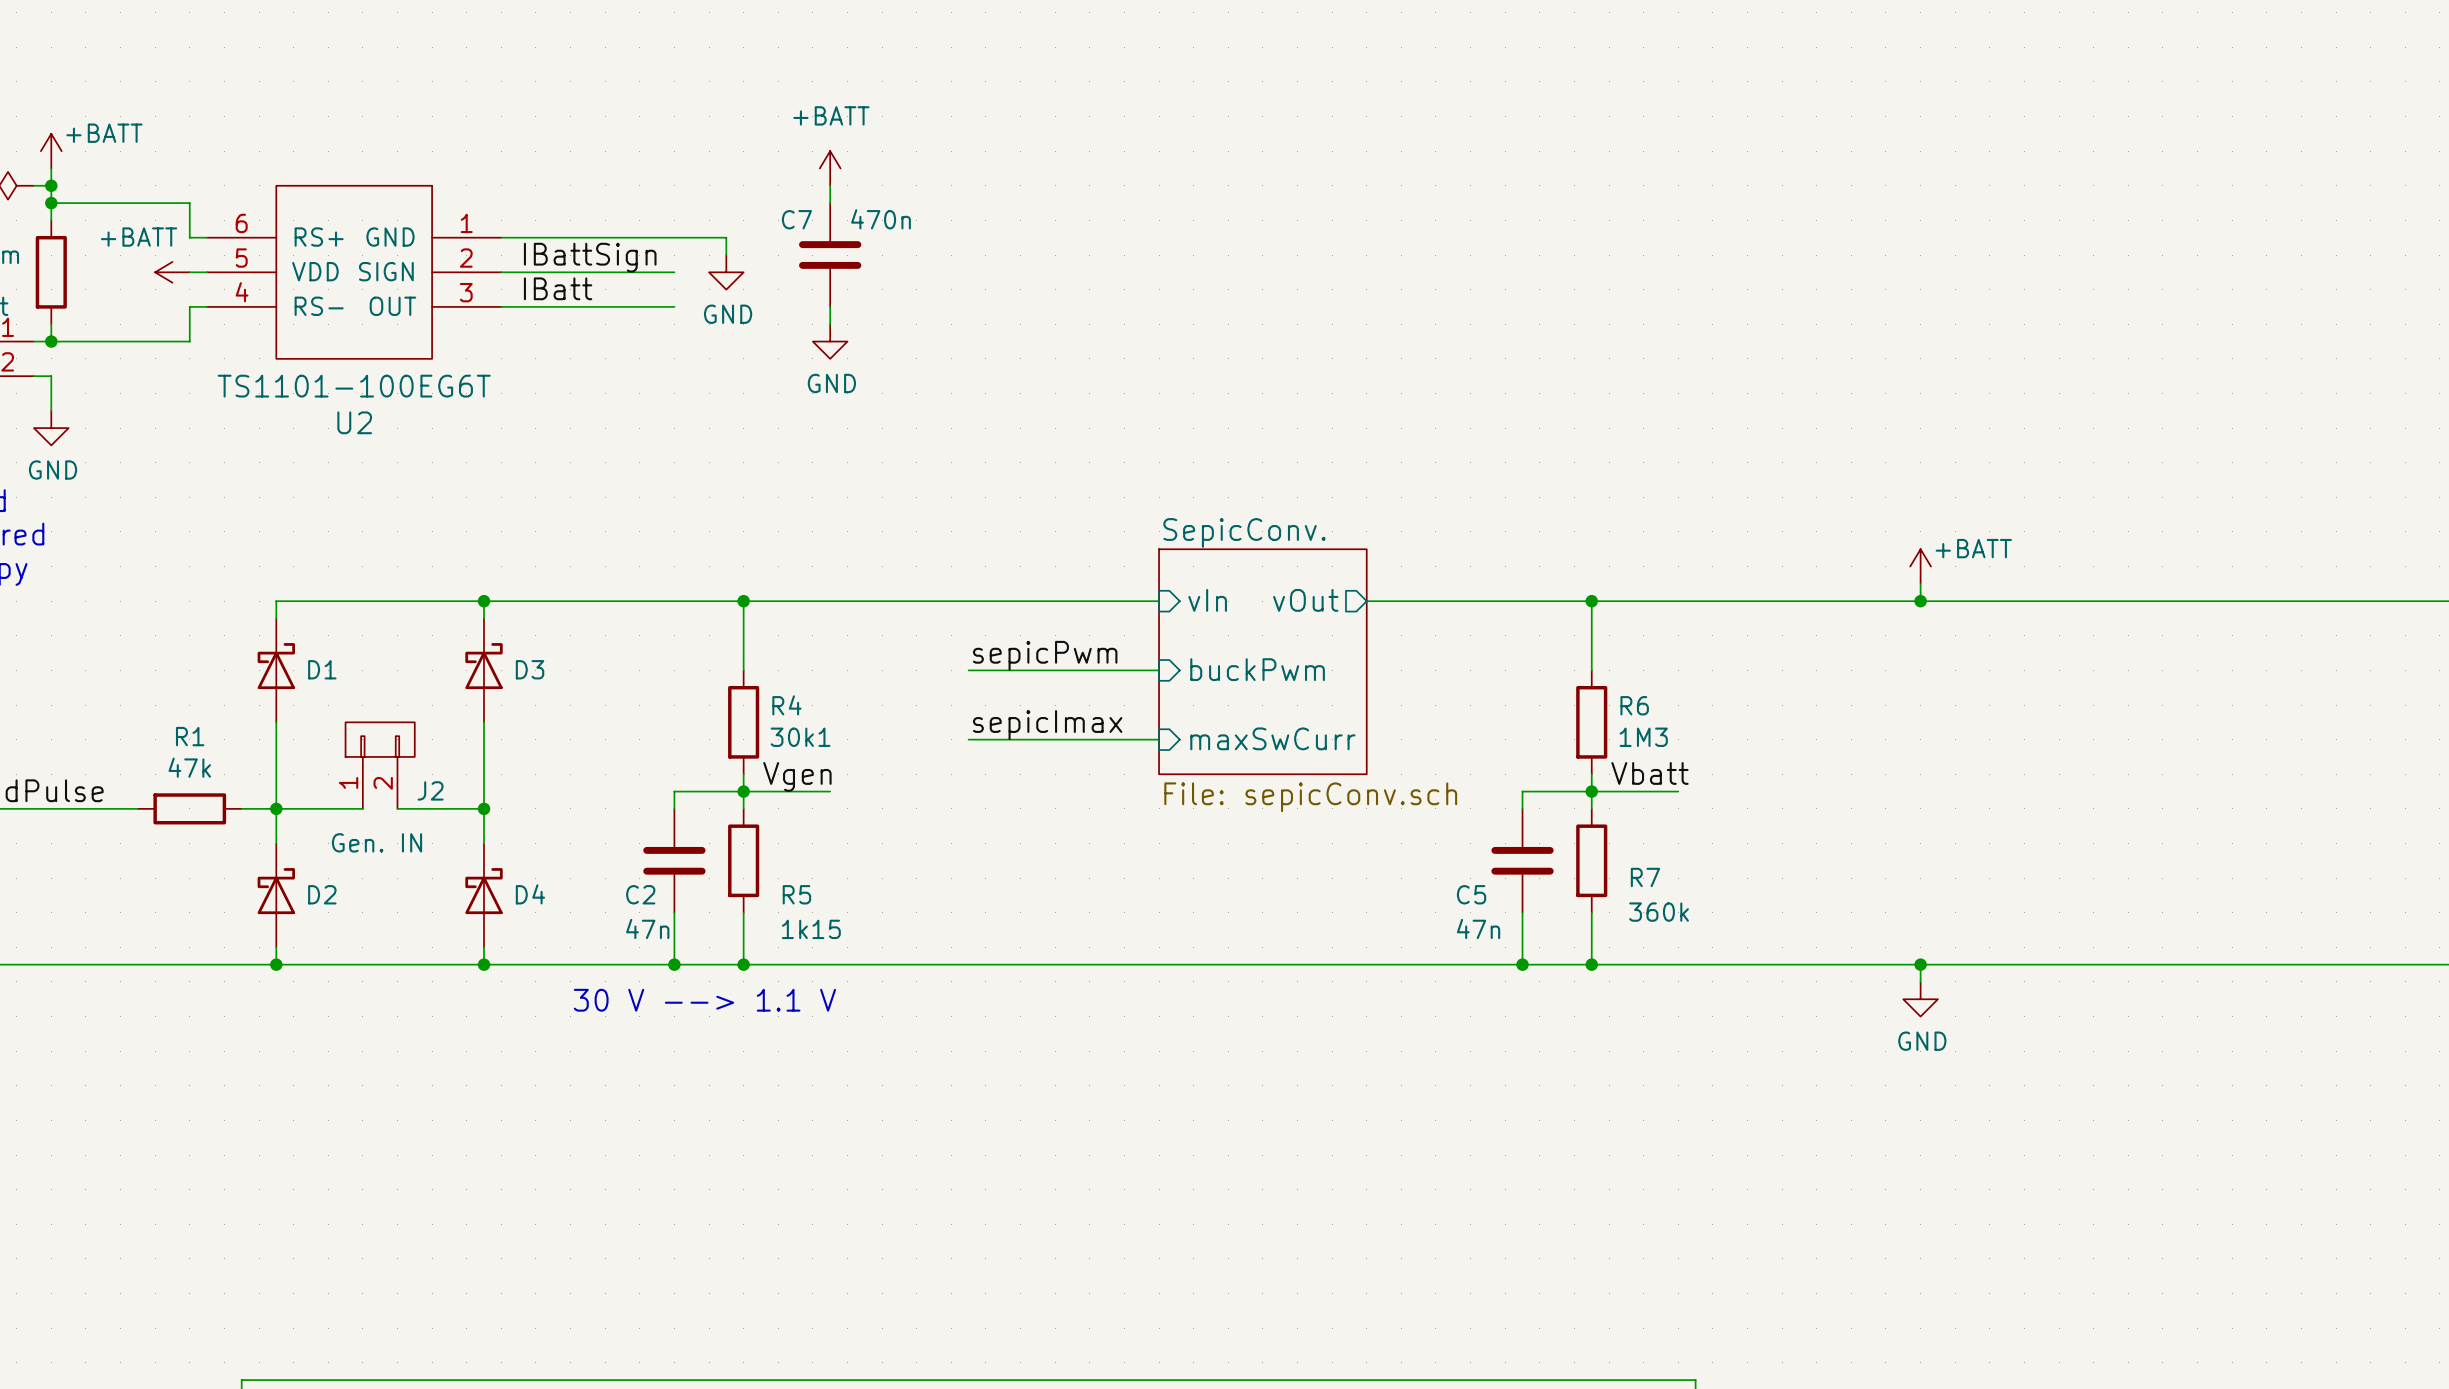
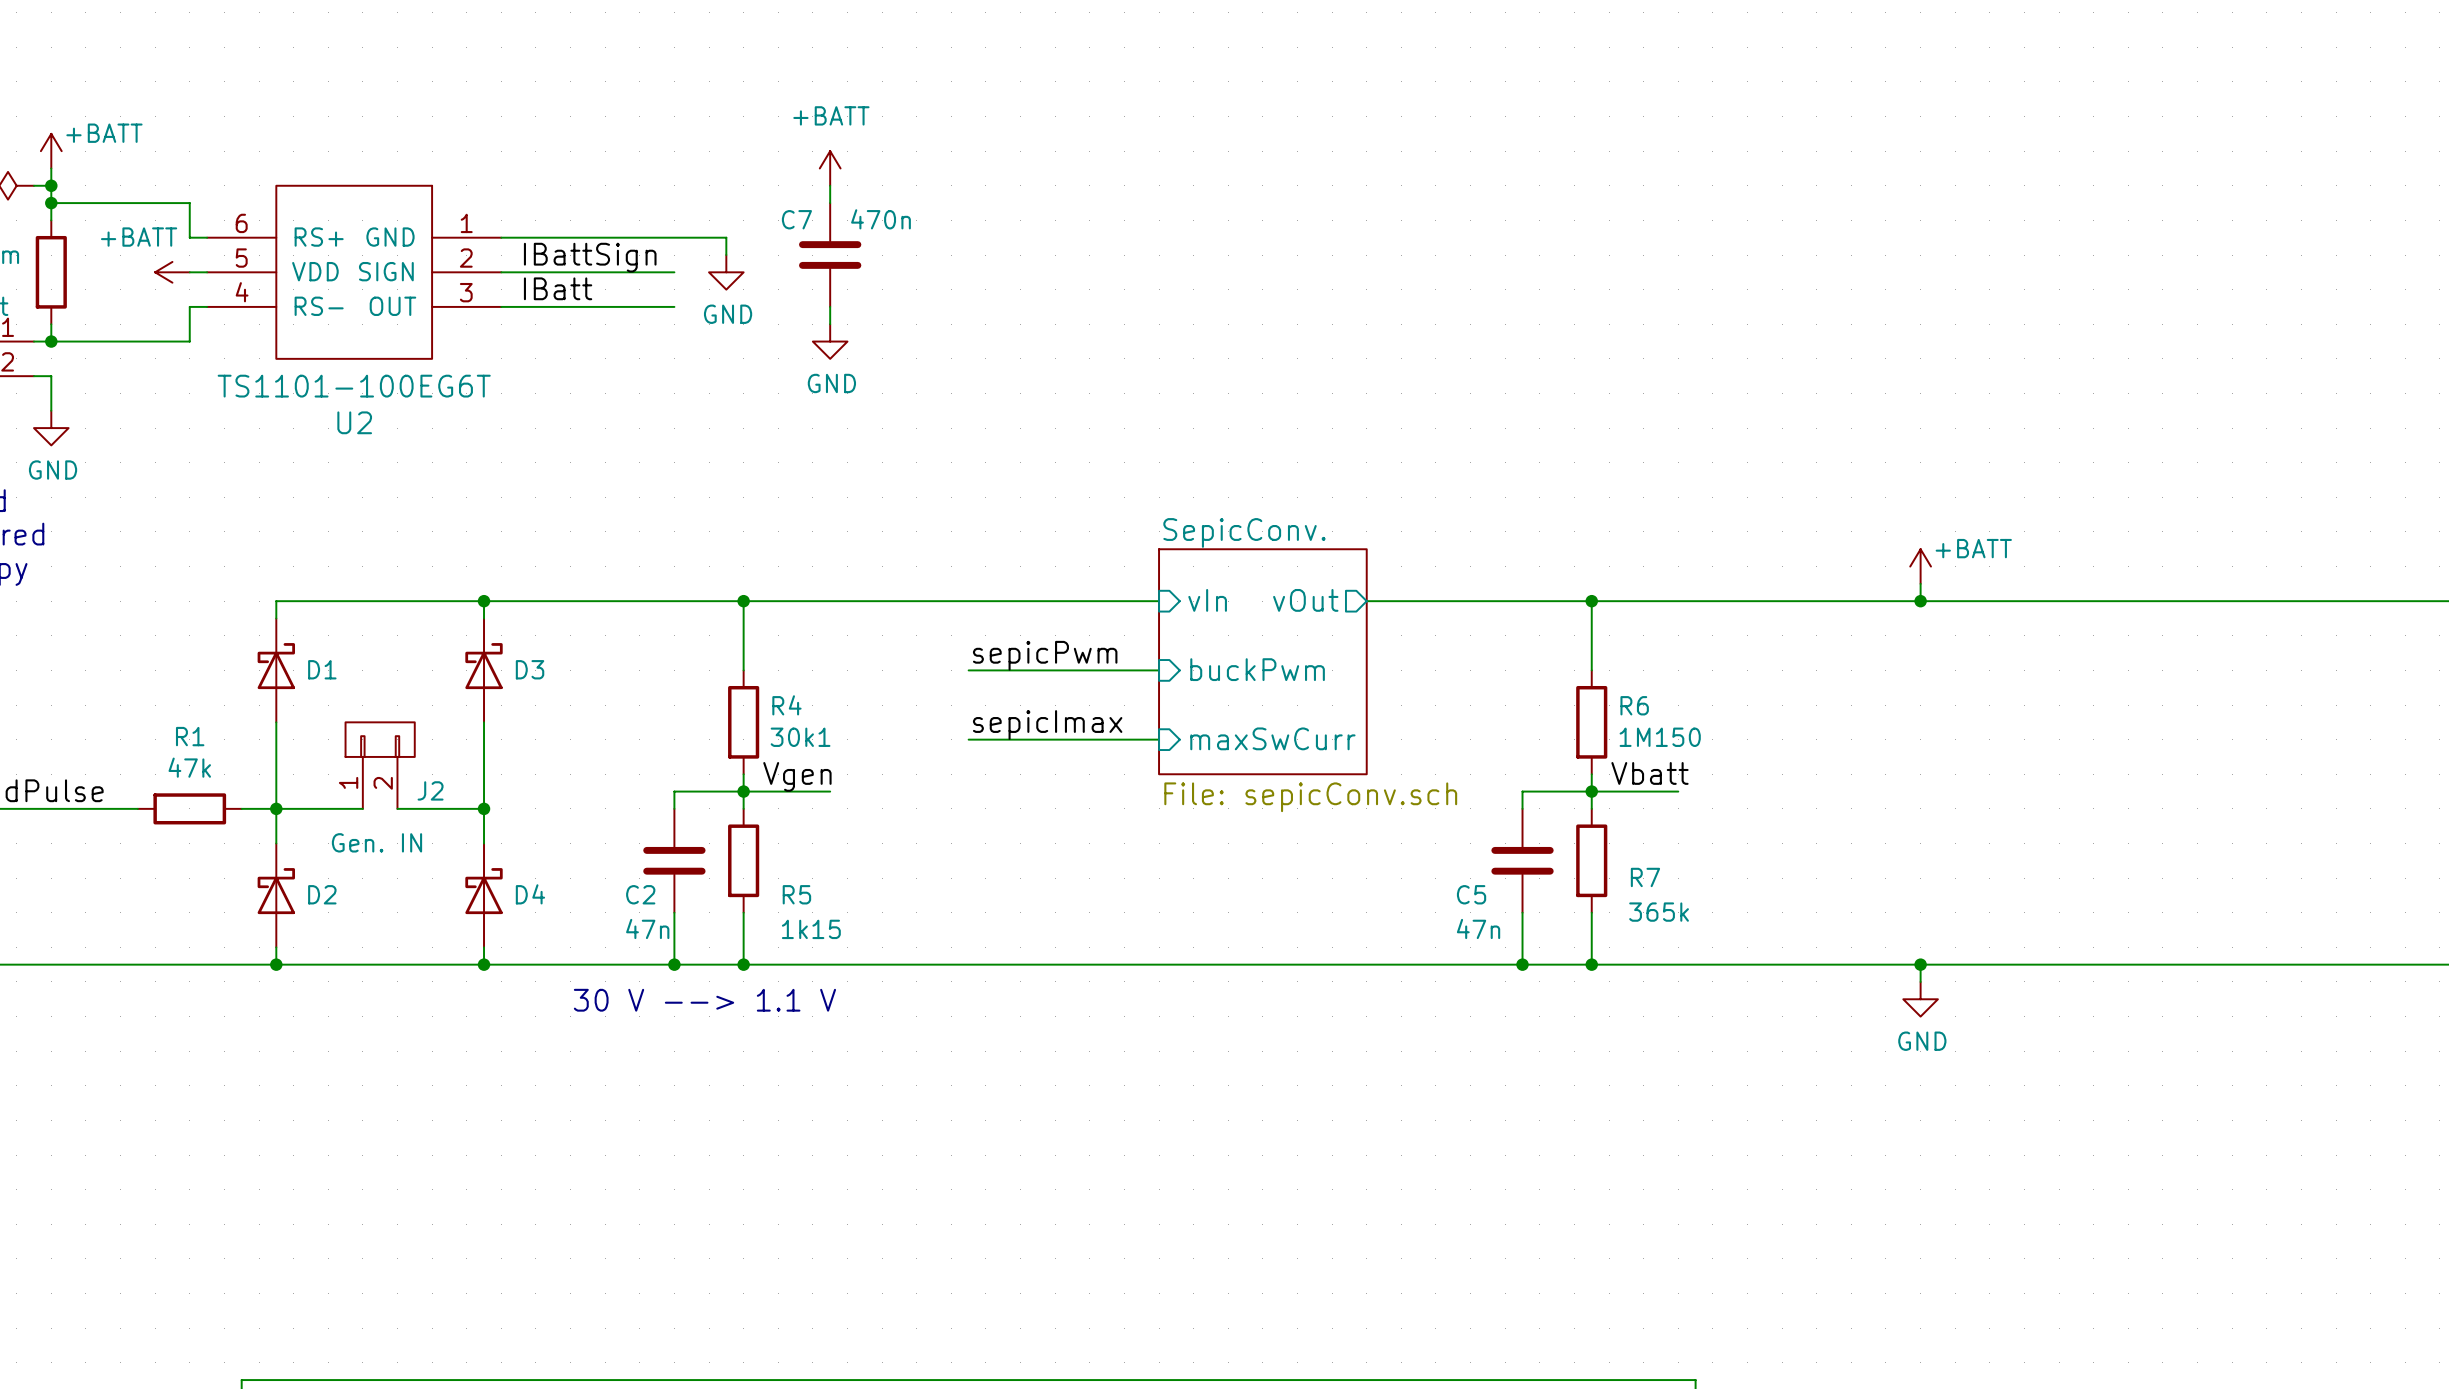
R6 value: 1M3 (1643, 737) -> 1M150 (1660, 737)
R7 value: 360k (1659, 912) -> 365k (1659, 912)

